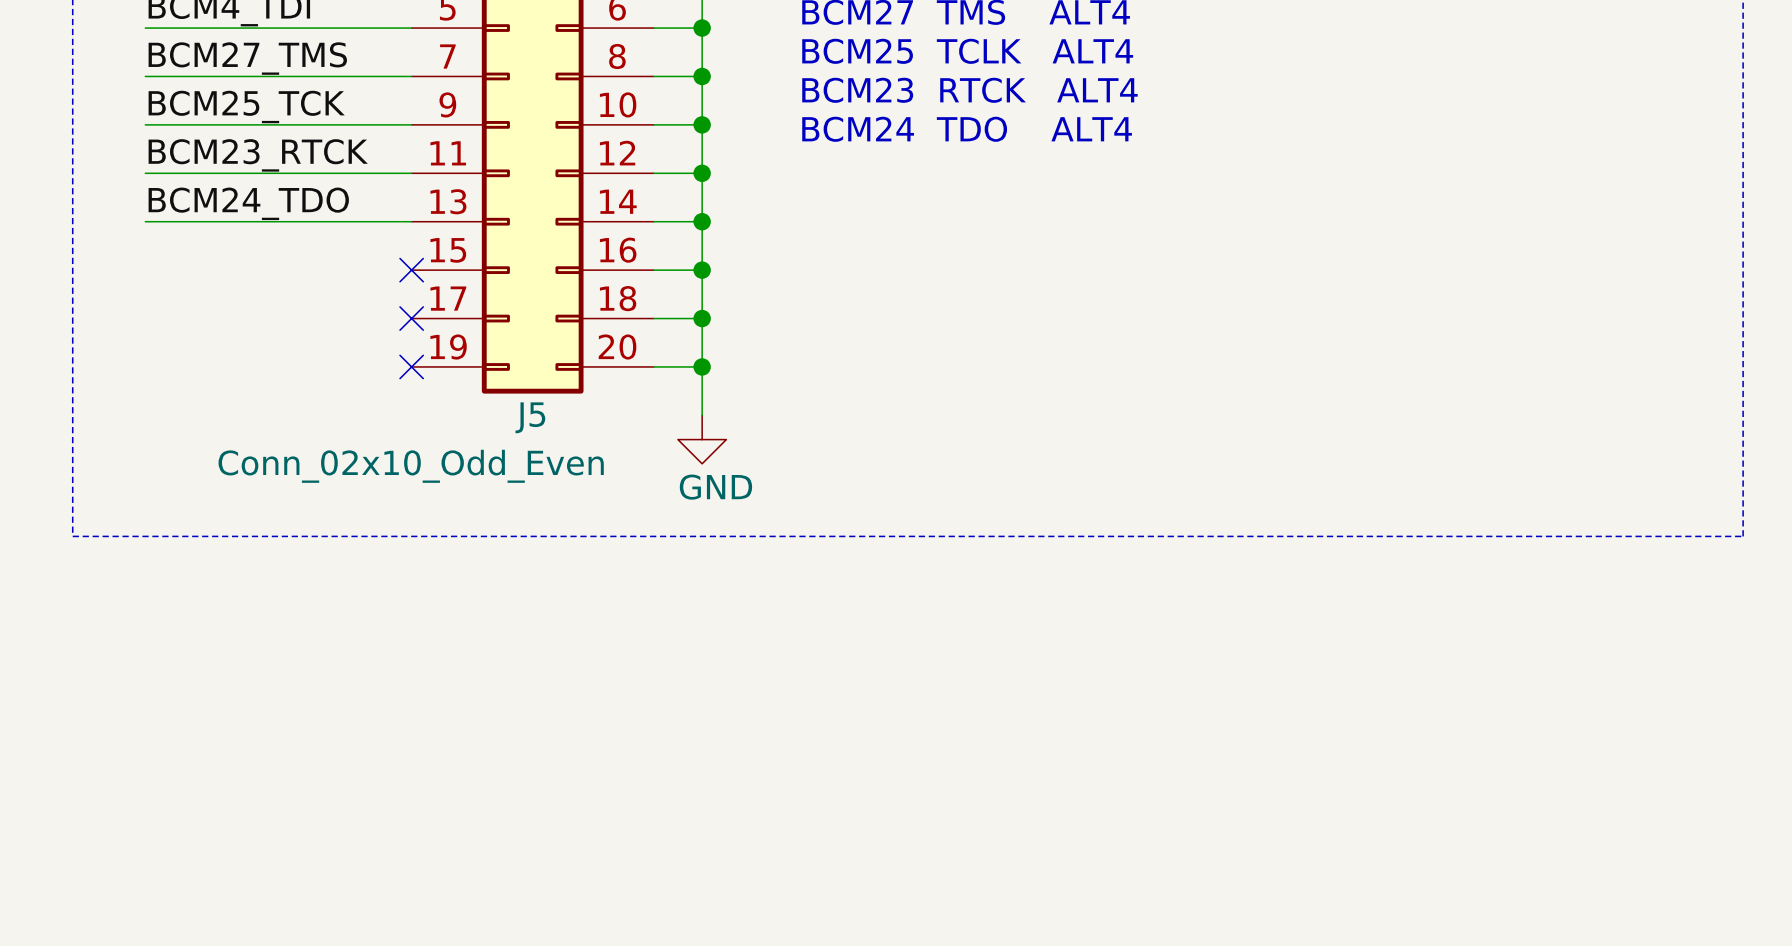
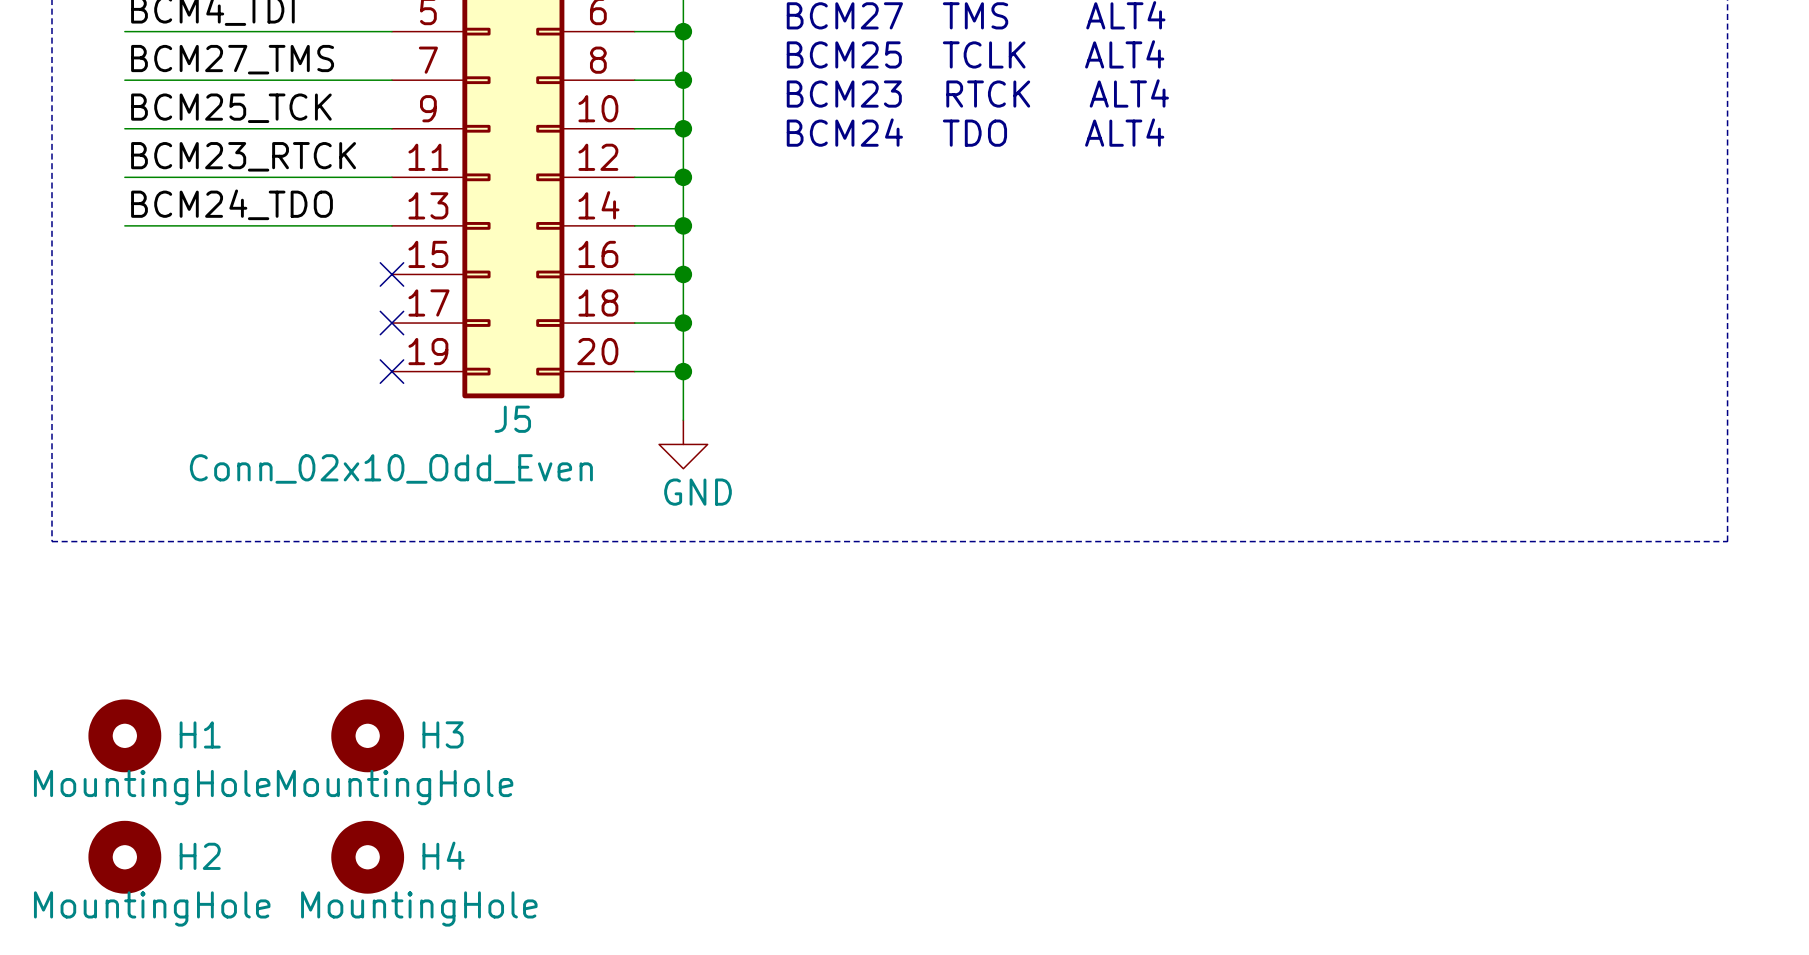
H1: none -> MountingHole (124, 735)
H3: none -> MountingHole (367, 735)
H2: none -> MountingHole (124, 857)
H4: none -> MountingHole (367, 857)

